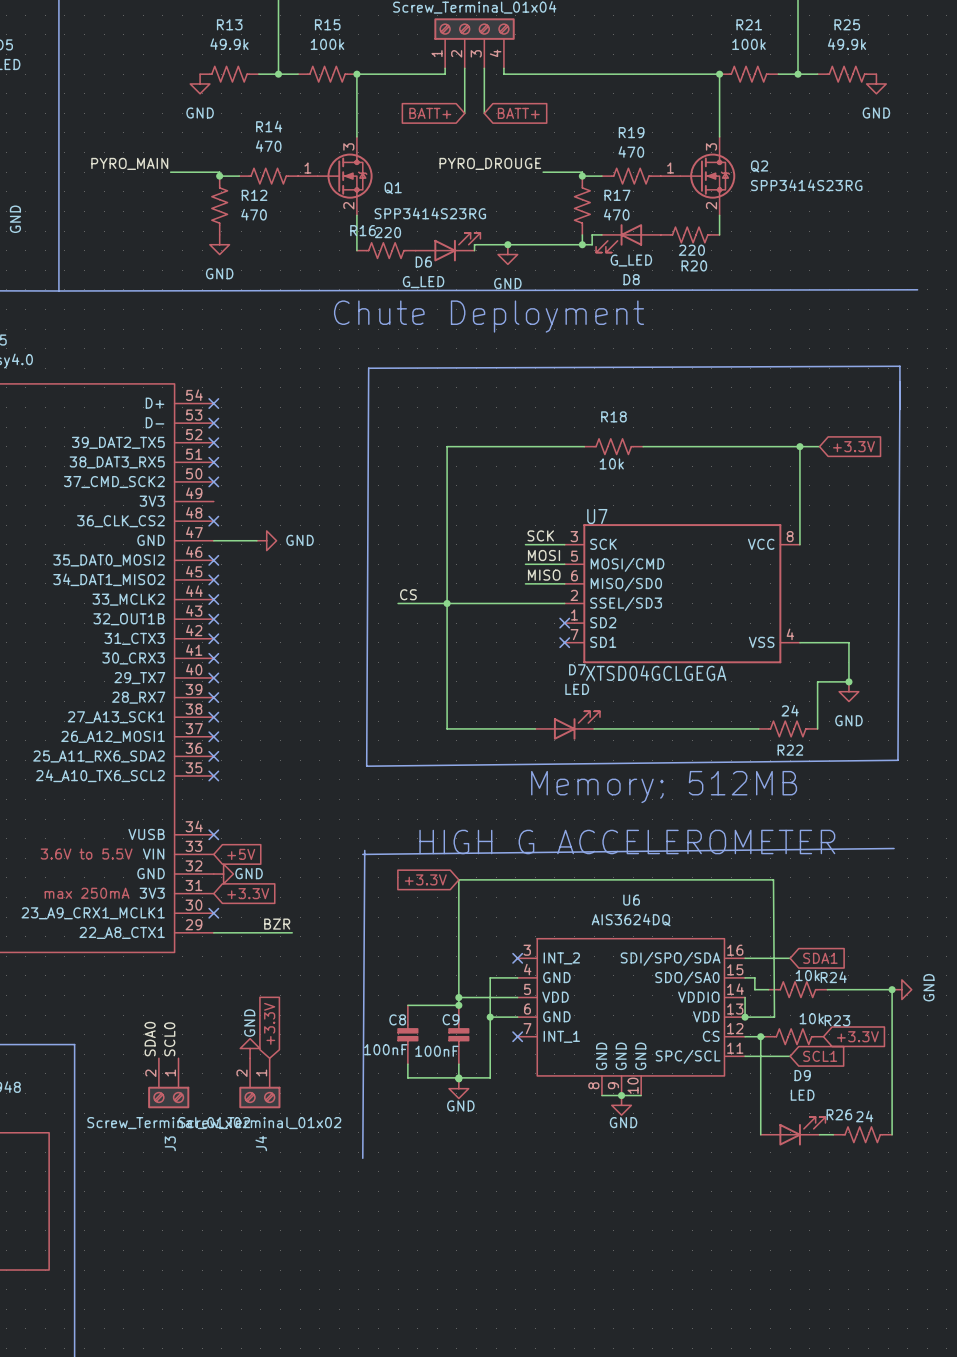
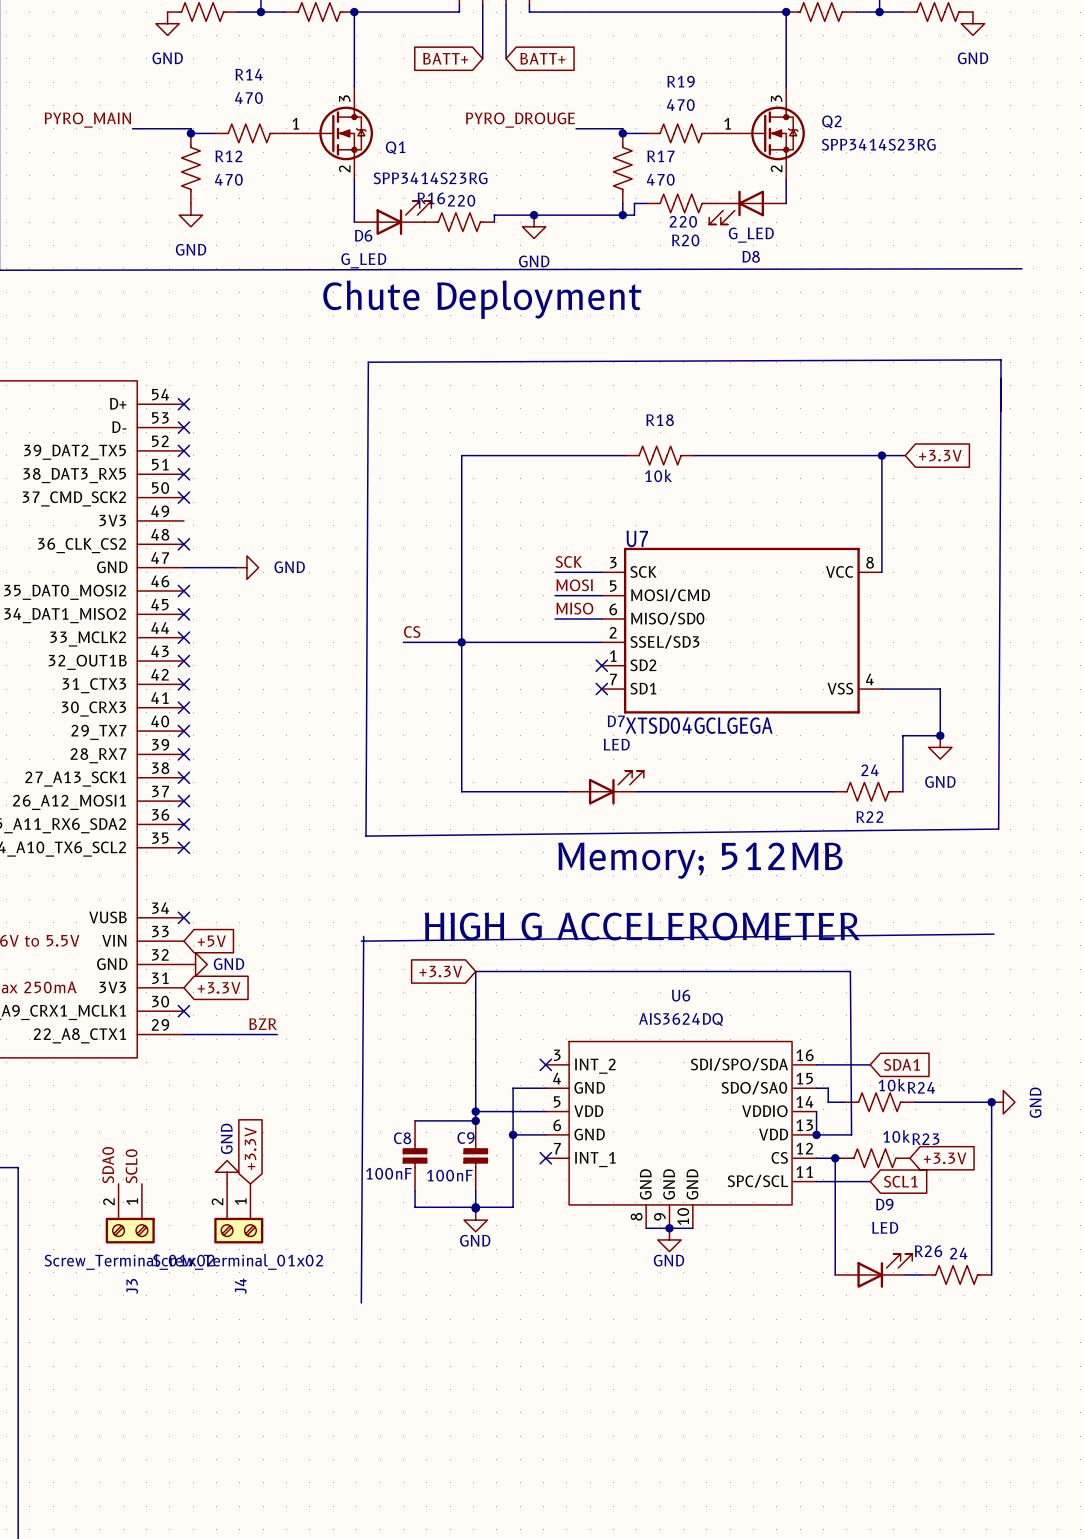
R20 position: (690, 234) -> (681, 203)
D8 position: (628, 238) -> (747, 207)
D6 position: (448, 247) -> (392, 218)
R16 position: (386, 250) -> (459, 222)

